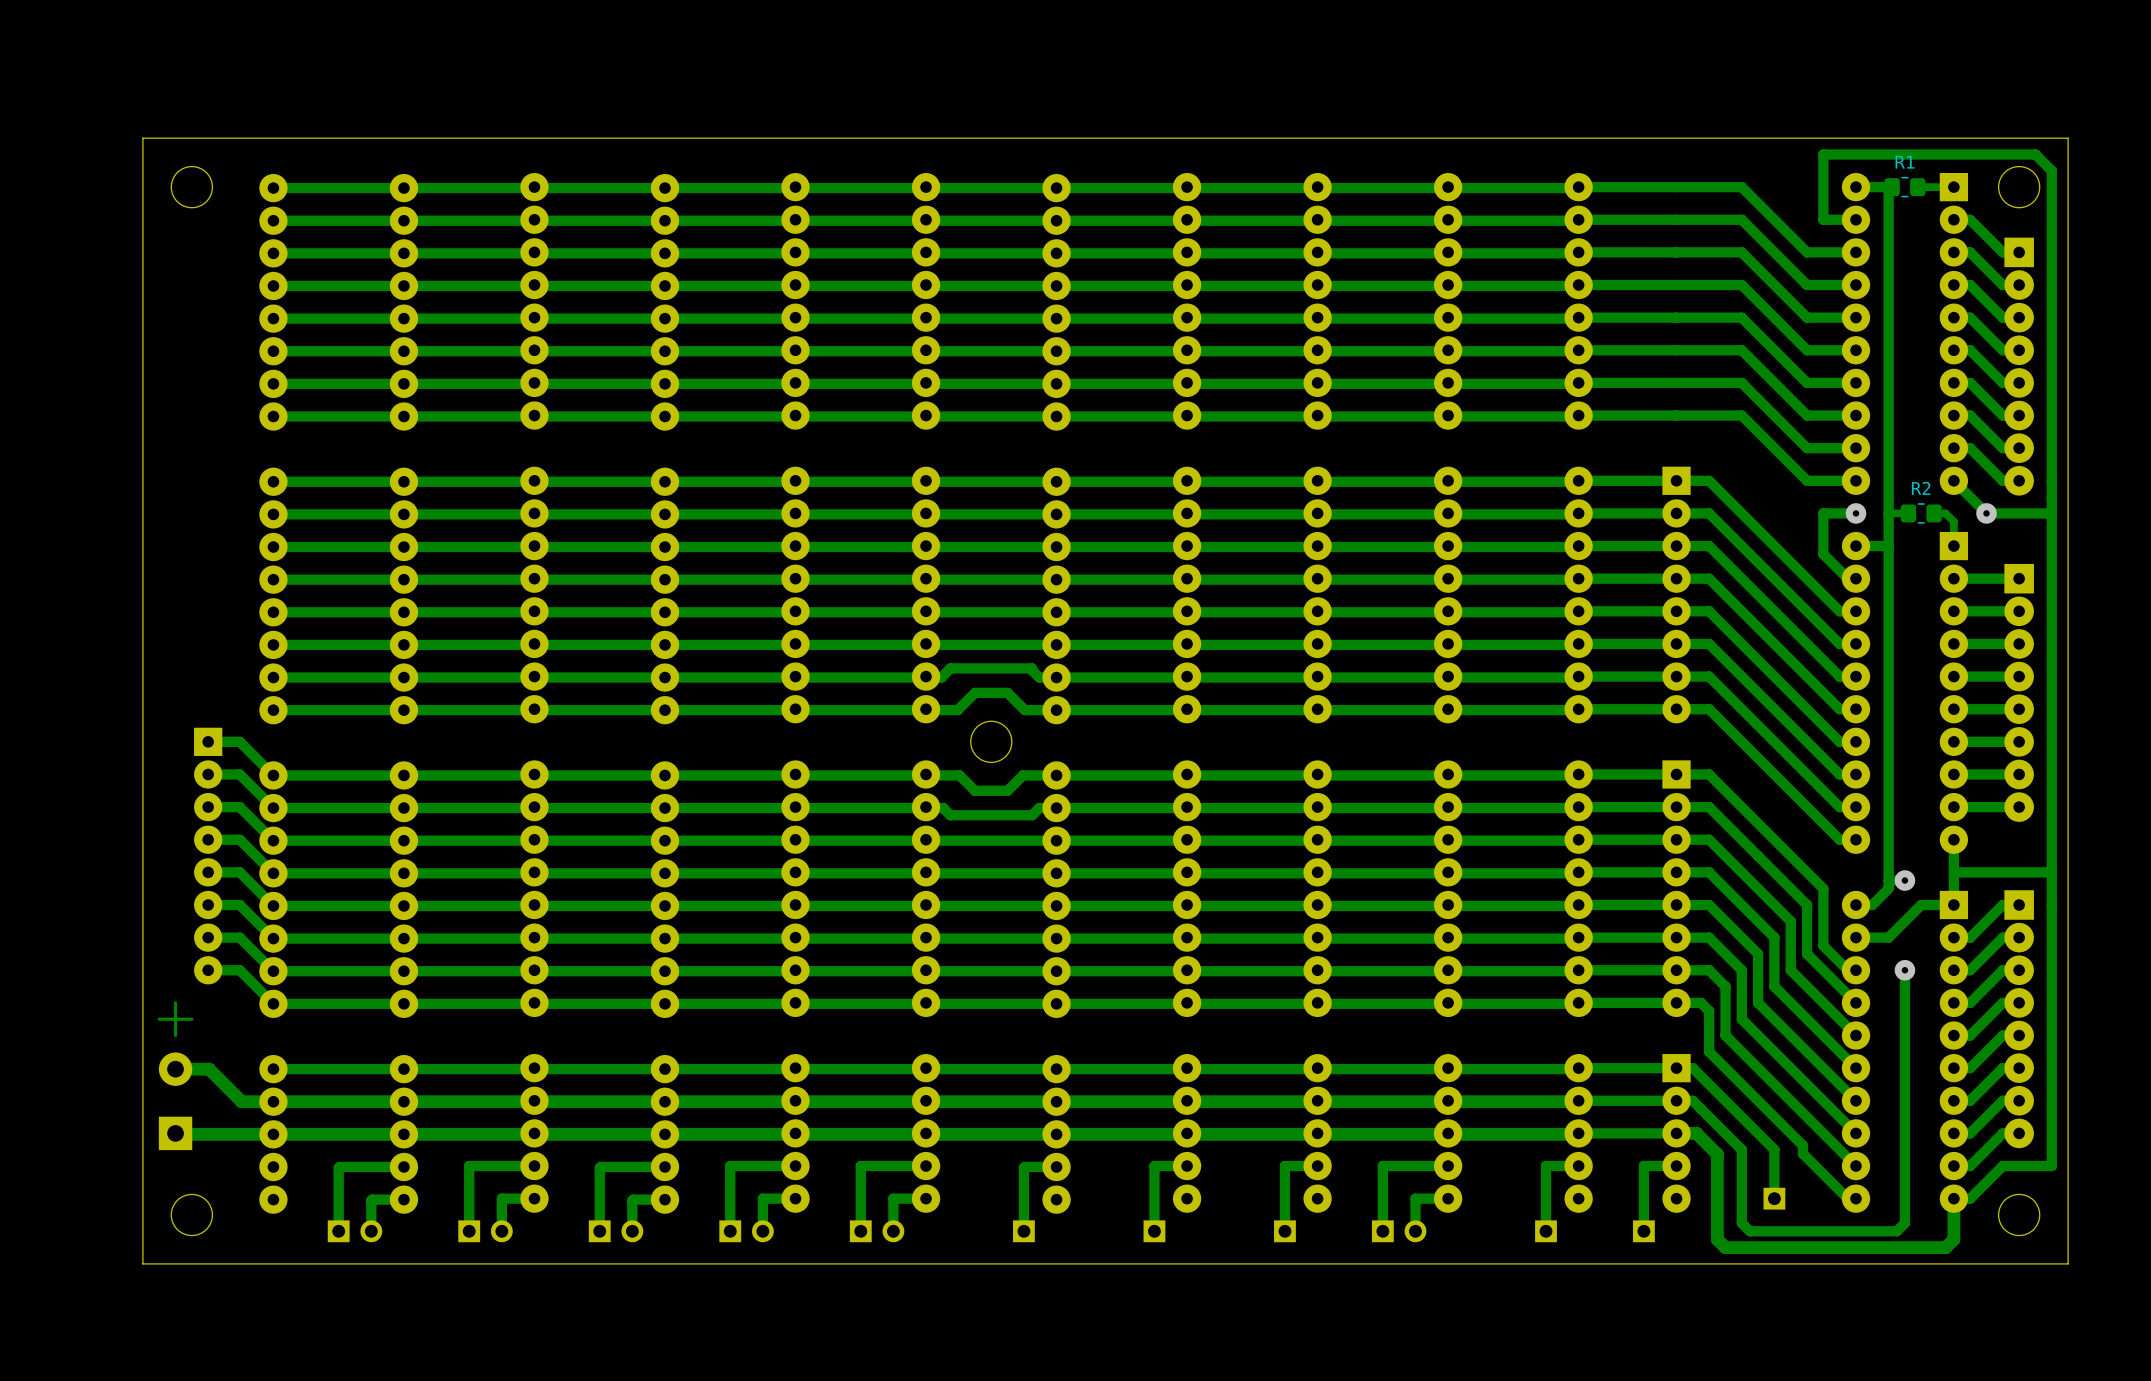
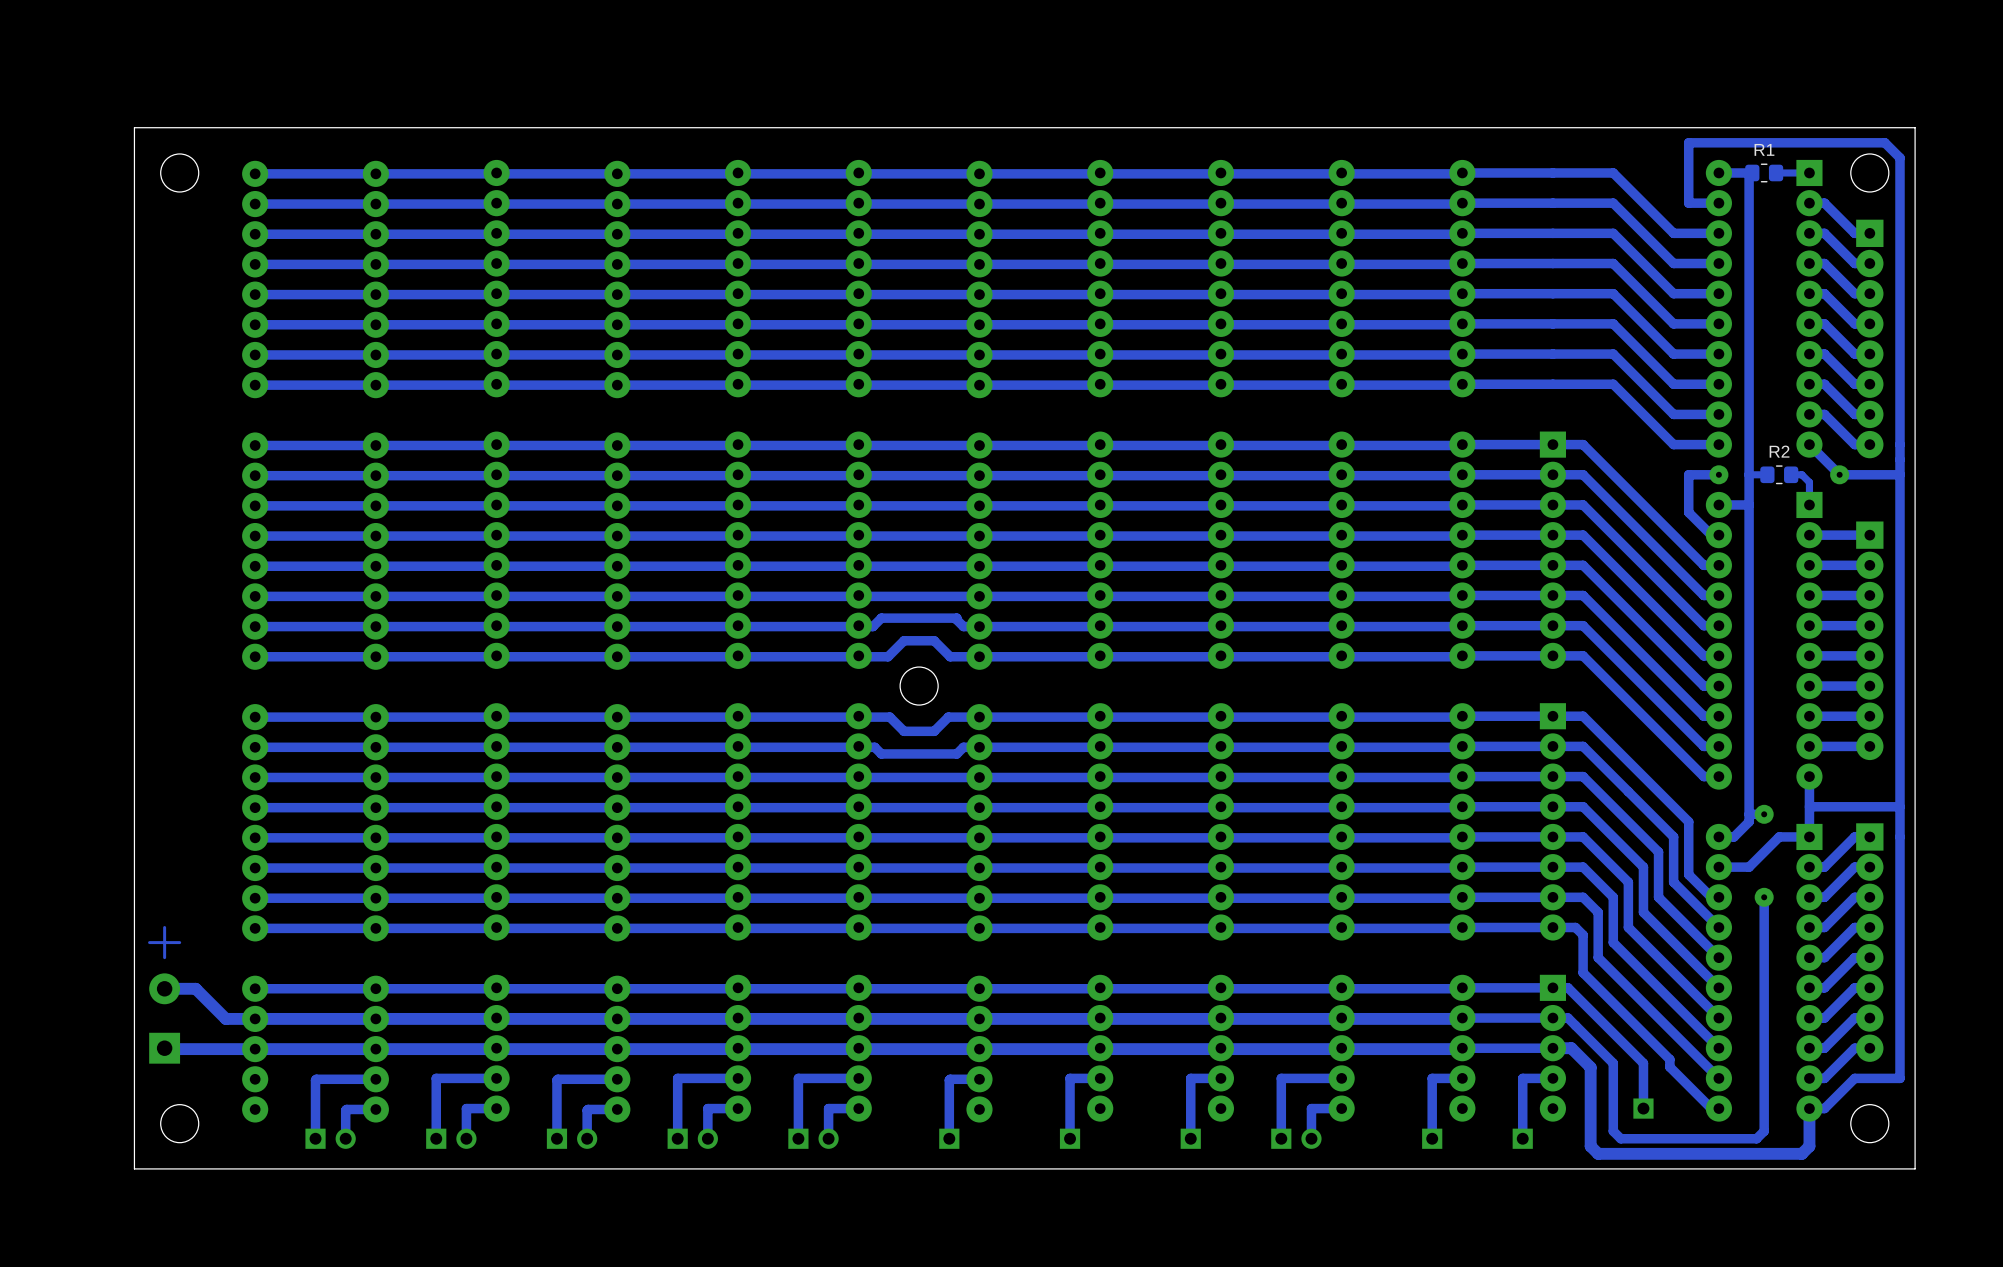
track: (208, 741) (239, 741) (273, 775) -> none
track: (208, 774) (239, 774) (273, 808) -> none
track: (208, 807) (239, 807) (273, 840) -> none
track: (208, 839) (239, 839) (273, 873) -> none
part: (208, 856) -> none
track: (208, 872) (239, 872) (273, 905) -> none
track: (208, 904) (239, 904) (273, 938) -> none
track: (208, 937) (239, 937) (273, 971) -> none
track: (208, 970) (239, 970) (273, 1003) -> none

